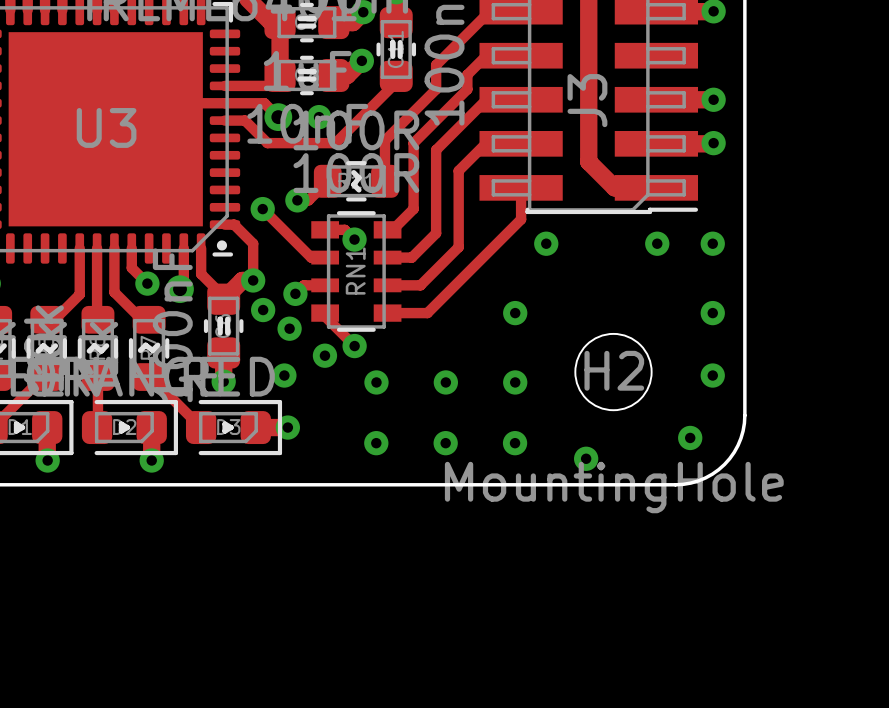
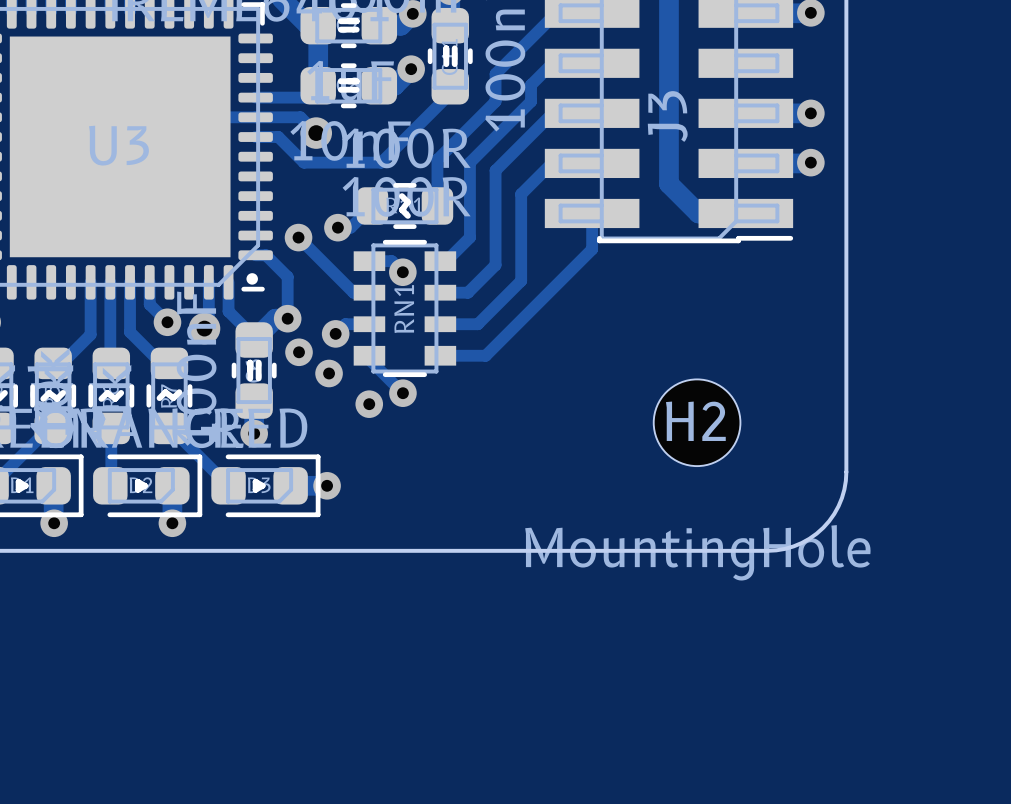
via: (319, 117) -> none
via: (546, 243) -> none
via: (657, 243) -> none
via: (712, 243) -> none
via: (515, 313) -> none
via: (712, 313) -> none
via: (284, 375) -> none
via: (712, 375) -> none
via: (376, 382) -> none
via: (445, 382) -> none
via: (515, 382) -> none
via: (690, 437) -> none
via: (376, 443) -> none
via: (445, 443) -> none
via: (515, 443) -> none
via: (586, 458) -> none

